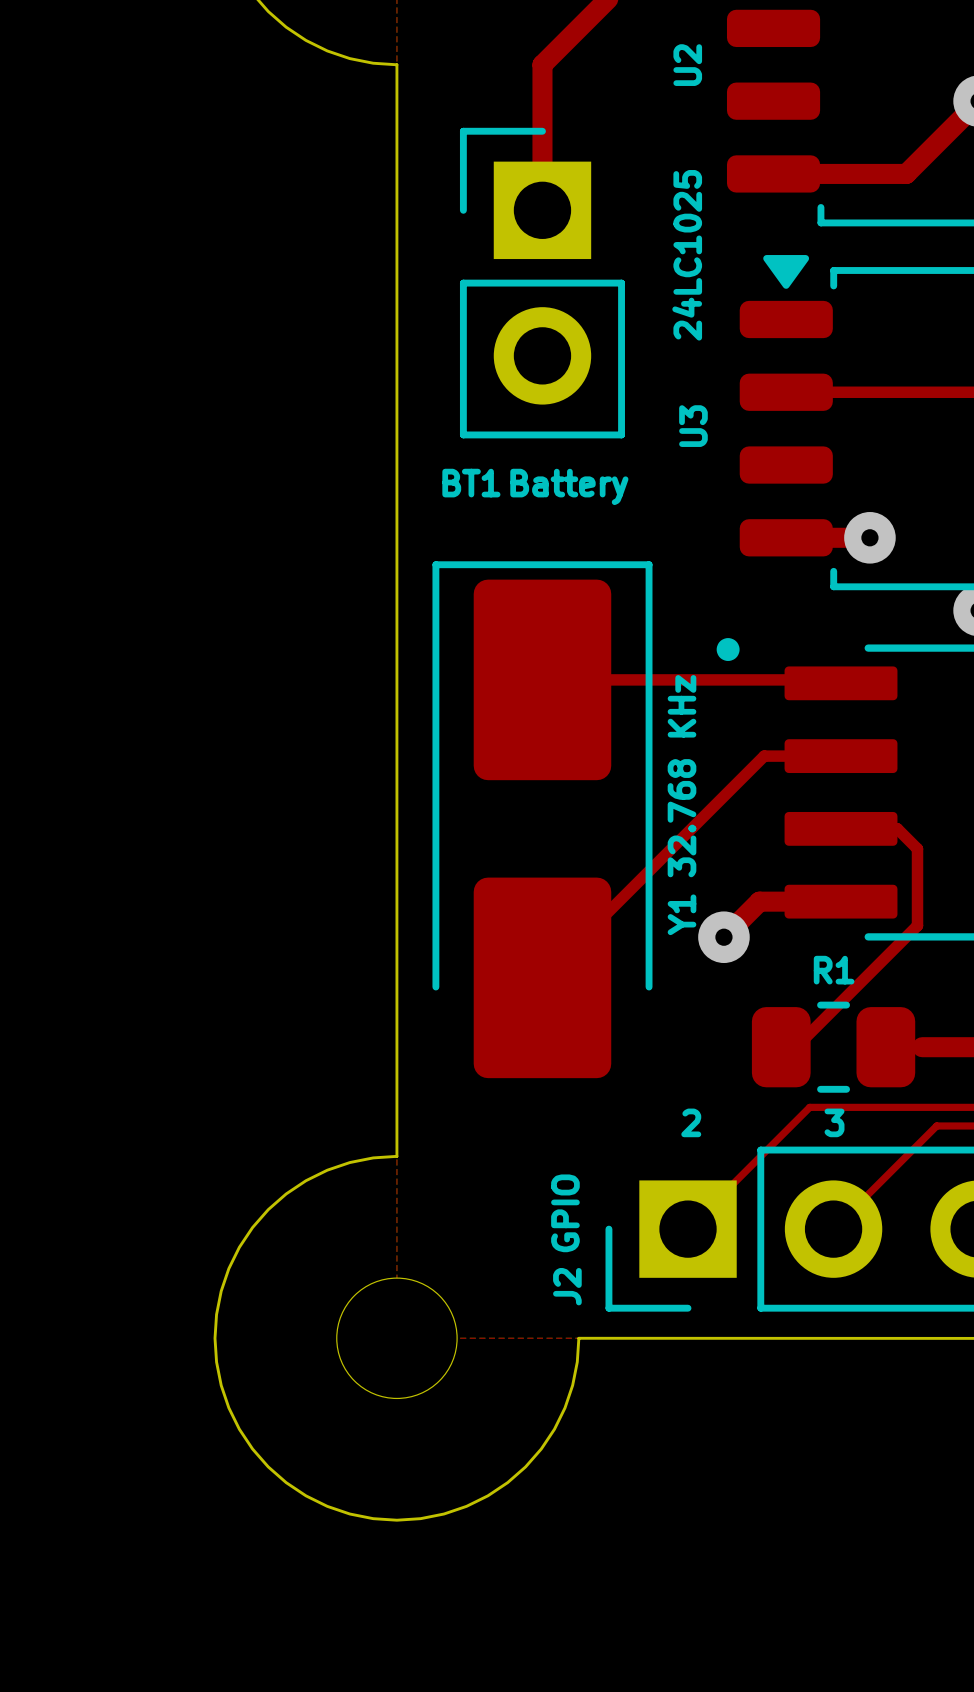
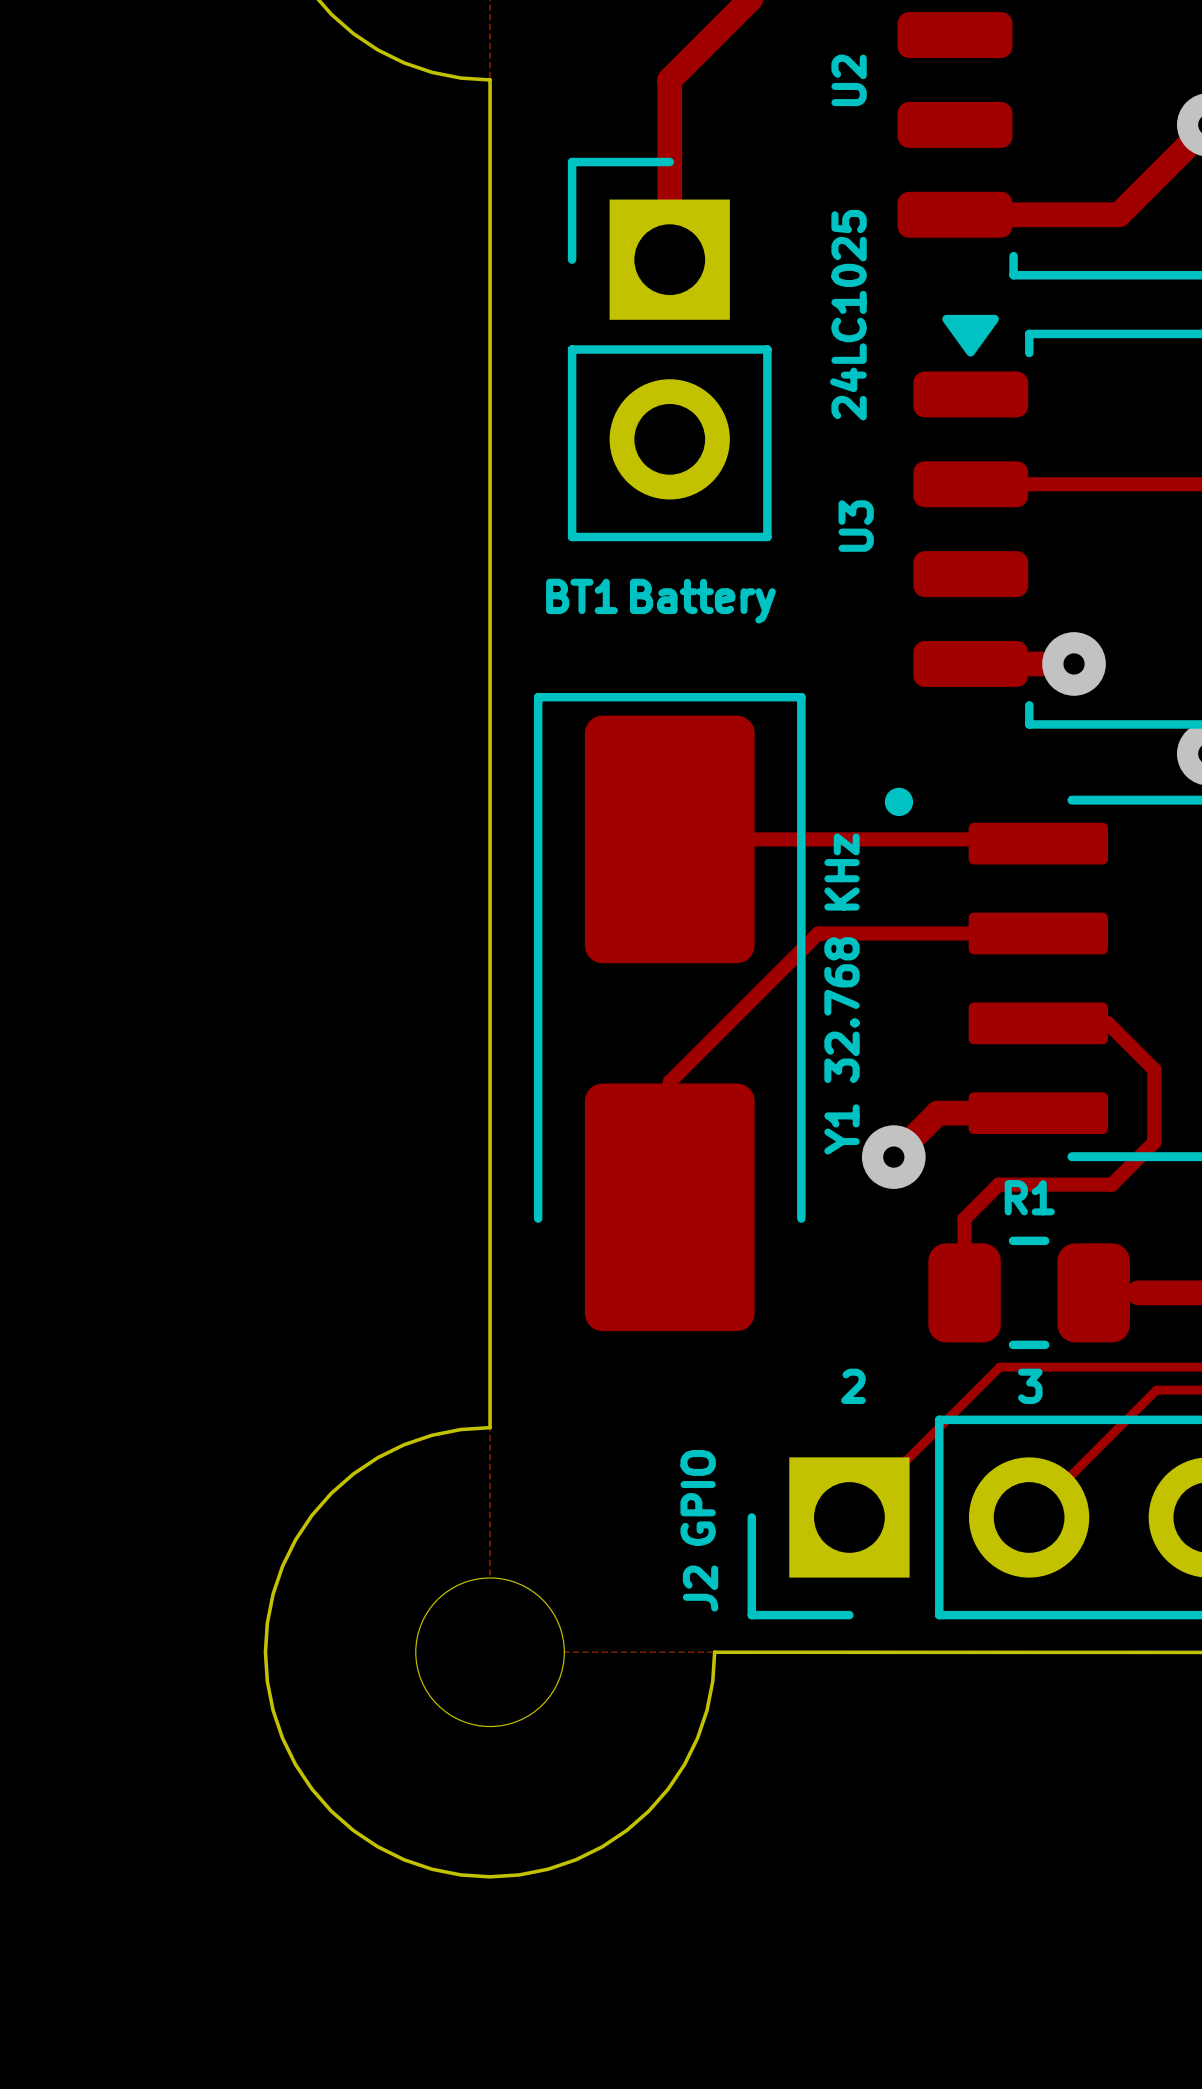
top track: (764, 756) (542, 977) -> (943, 933) (818, 933) (669, 1082) (669, 1207)
top track: (917, 848) (917, 925) (796, 1047) (781, 1047) -> (1132, 1048) (1154, 1069) (1154, 1142) (1111, 1184) (998, 1184) (964, 1218) (964, 1292)

